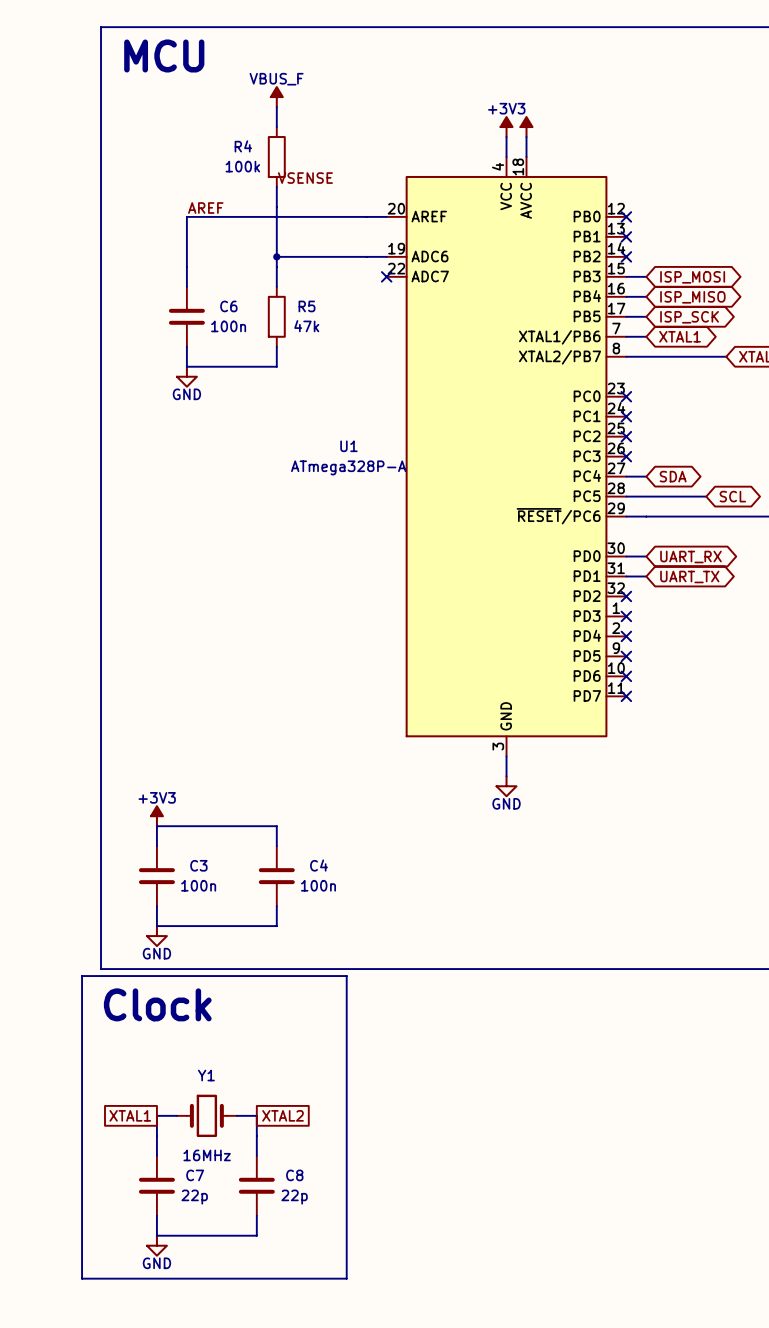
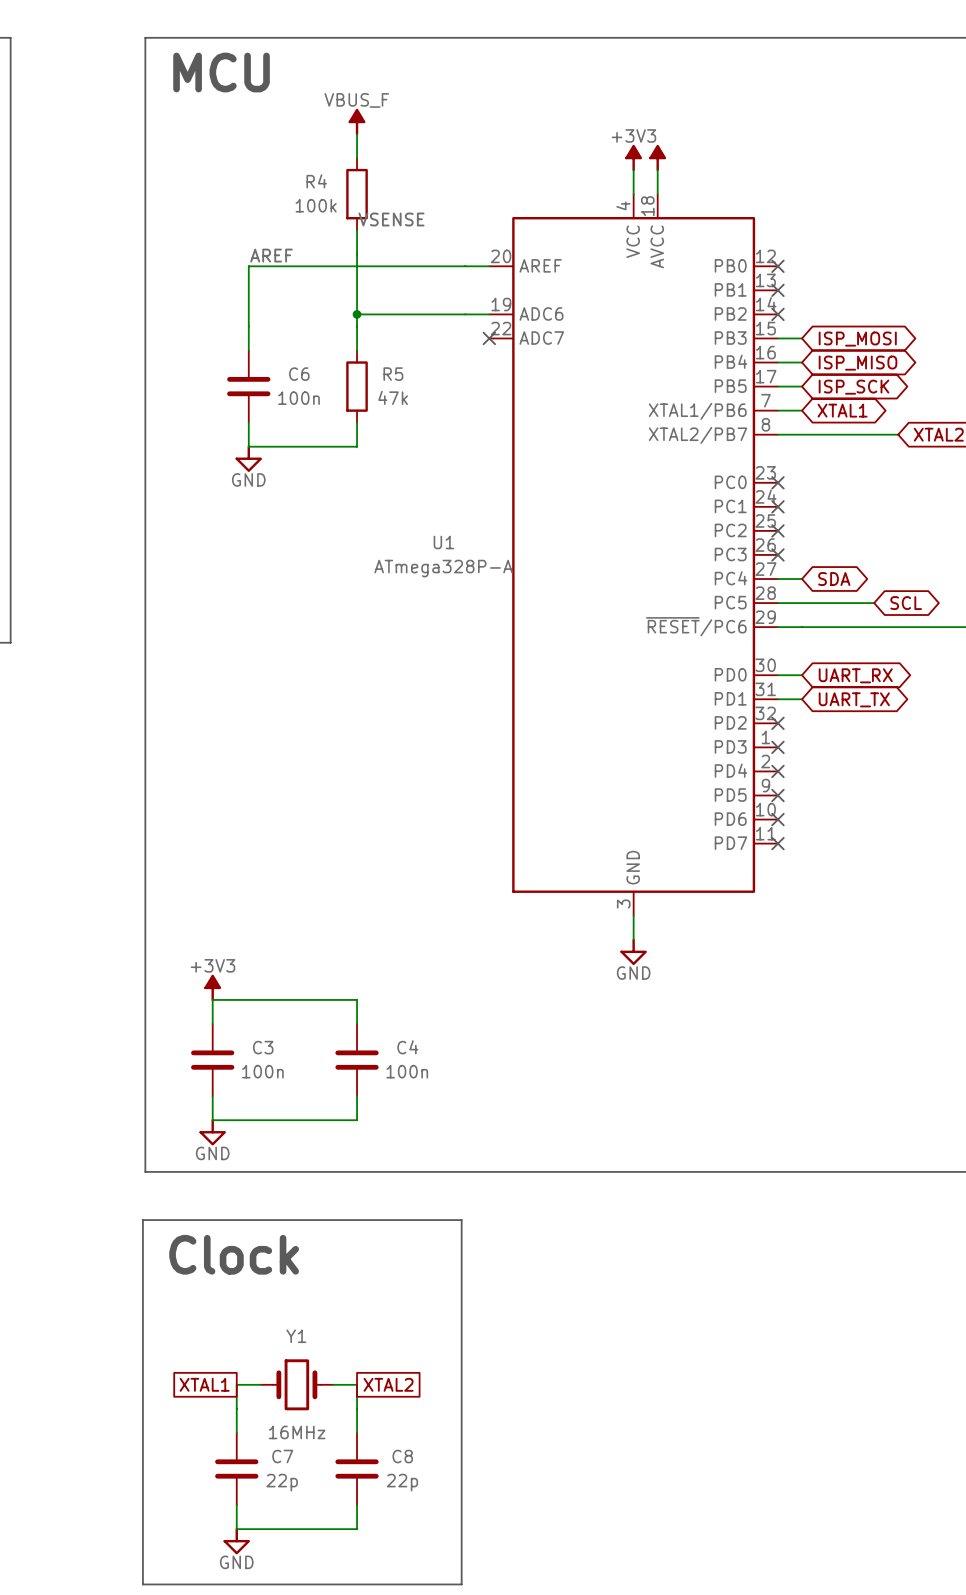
line: (82, 976) (346, 976) (346, 1278) (82, 1278) (82, 976) -> (142, 1220) (461, 1220) (461, 1584) (142, 1584) (142, 1220)
text position: Clock (157, 1004) -> Clock (234, 1254)
global label position: XTAL1 (130, 1115) -> XTAL1 (204, 1384)
wire: (176, 1115) (156, 1115) (156, 1155) -> (260, 1384) (236, 1384) (236, 1432)
Y1 position: (206, 1115) -> (296, 1384)
wire: (236, 1115) (256, 1115) (256, 1155) -> (332, 1384) (357, 1384) (357, 1432)
global label position: XTAL2 (283, 1115) -> XTAL2 (388, 1384)
C7 position: (156, 1185) -> (236, 1469)
C8 position: (256, 1185) -> (357, 1469)
wire: (156, 1215) (156, 1235) (256, 1235) (256, 1215) -> (236, 1505) (236, 1529) (357, 1529) (357, 1505)
power symbol position: GND (156, 1245) -> GND (236, 1541)

